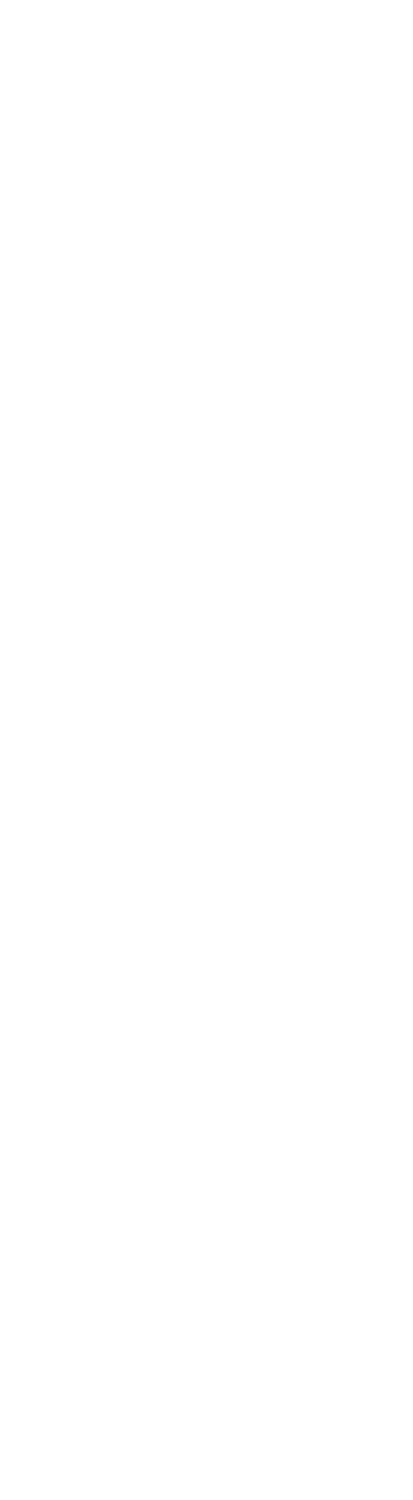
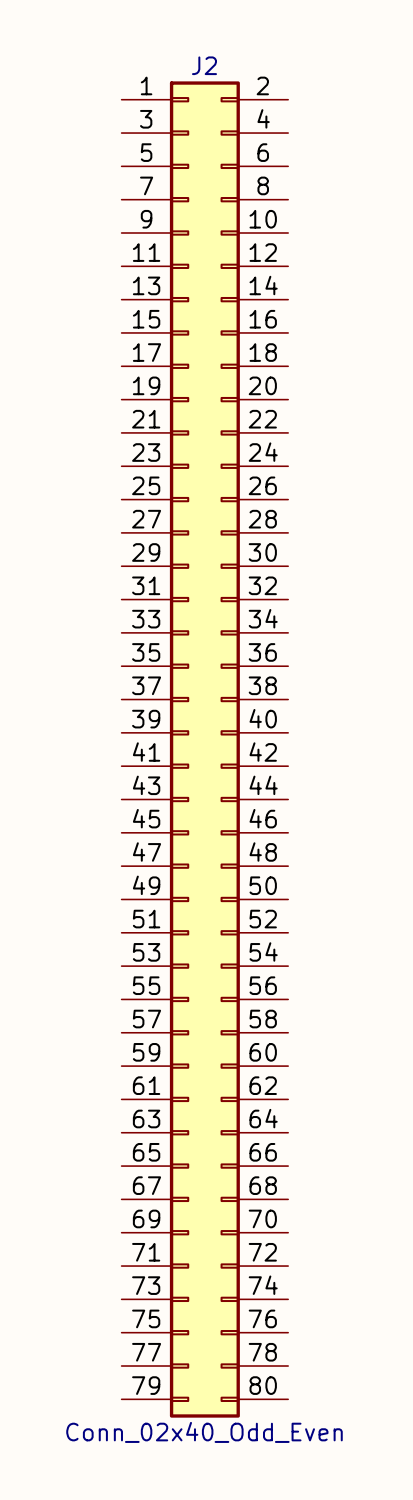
J2: none -> Conn_02x40_Odd_Even (204, 749)

